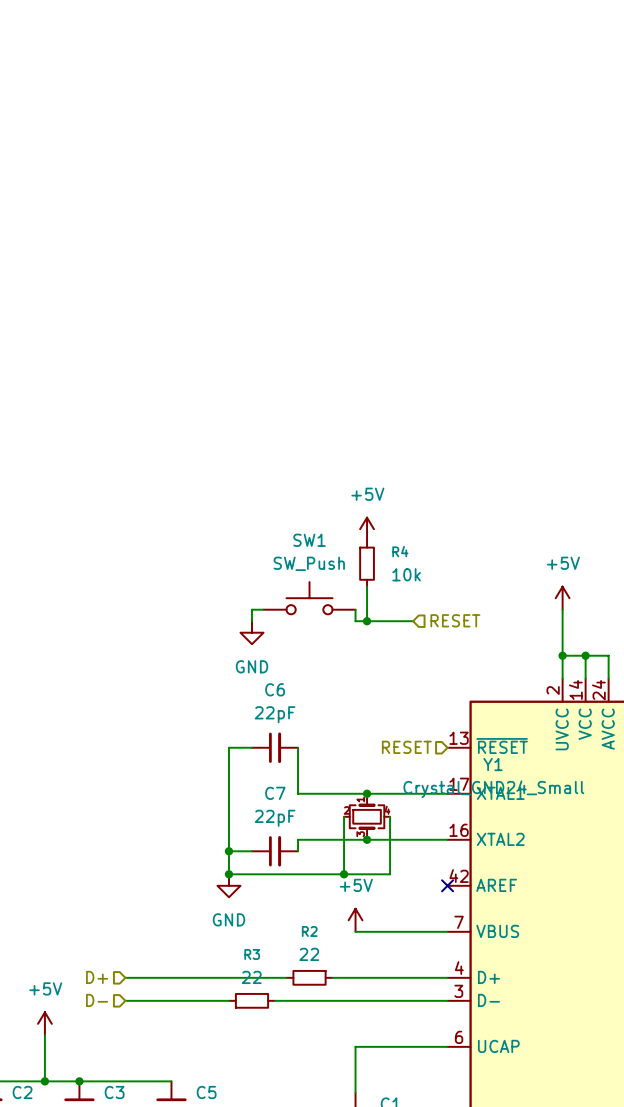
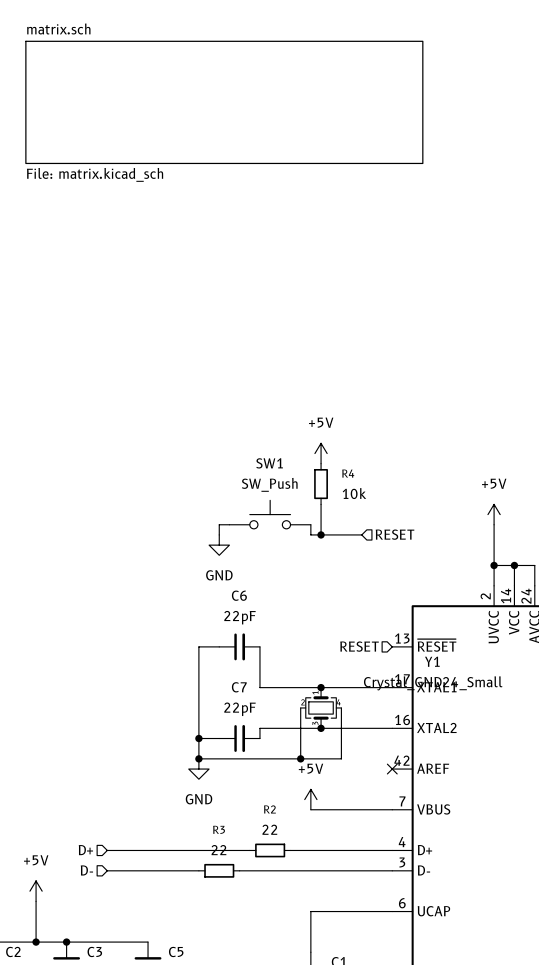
sheet matrix.sch: none -> File: matrix.kicad_sch (224, 102)

